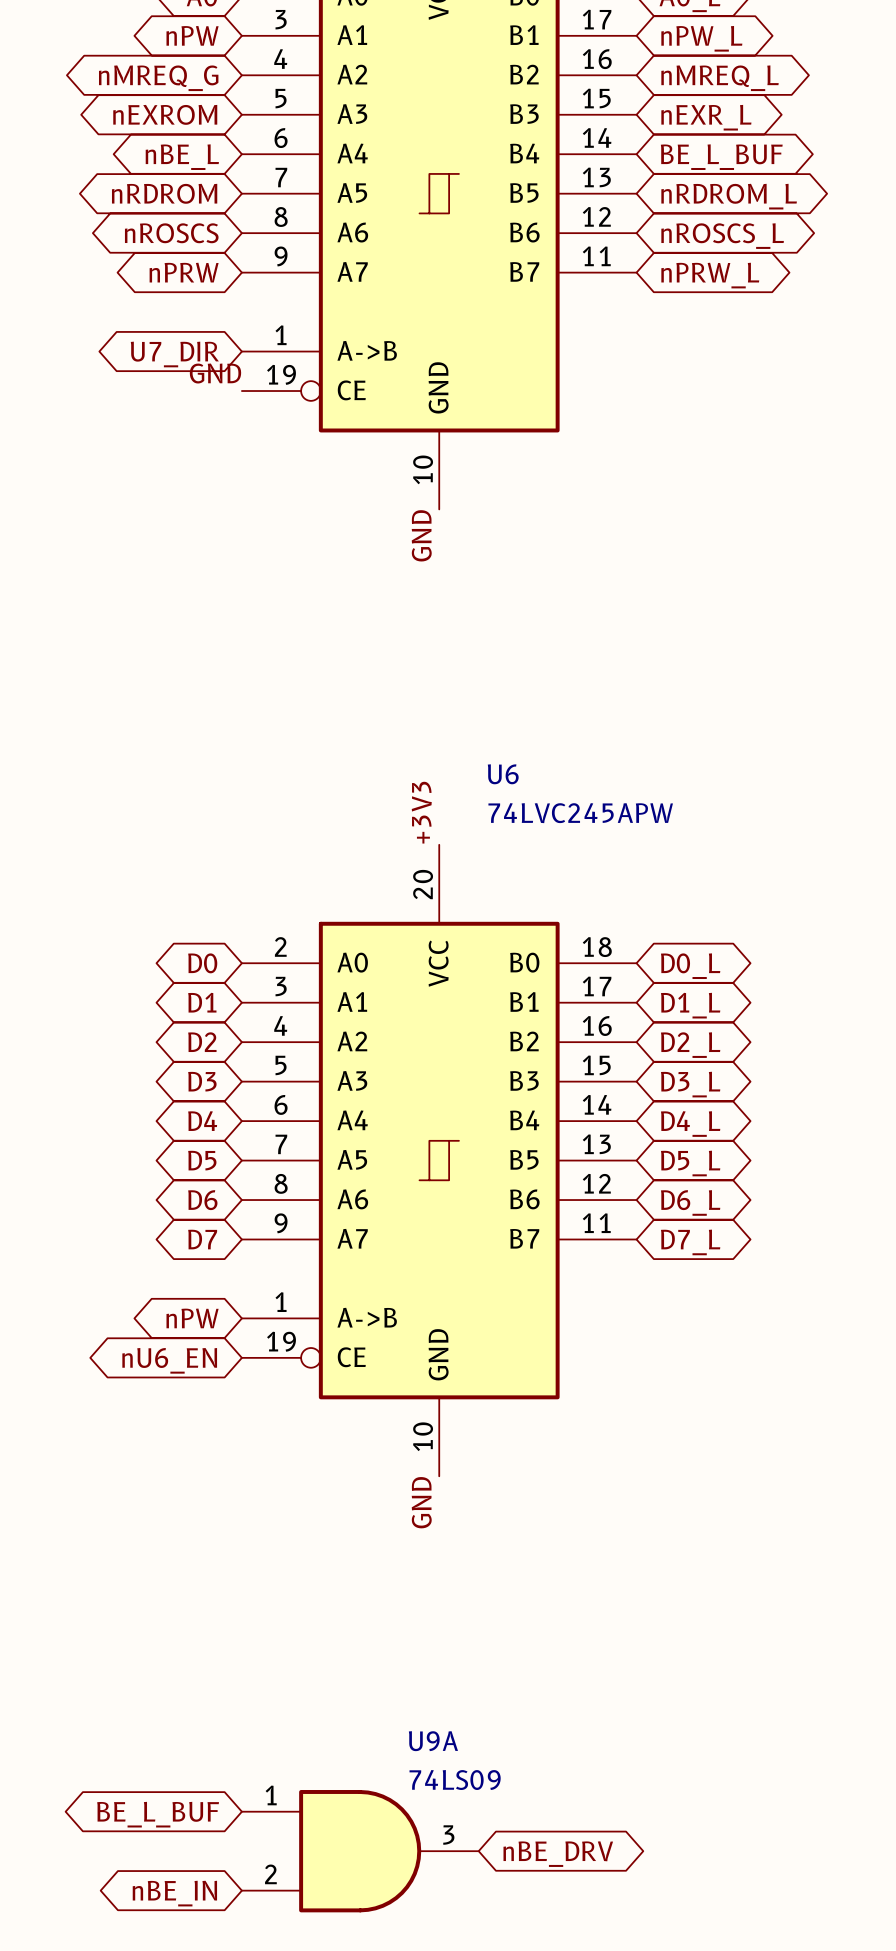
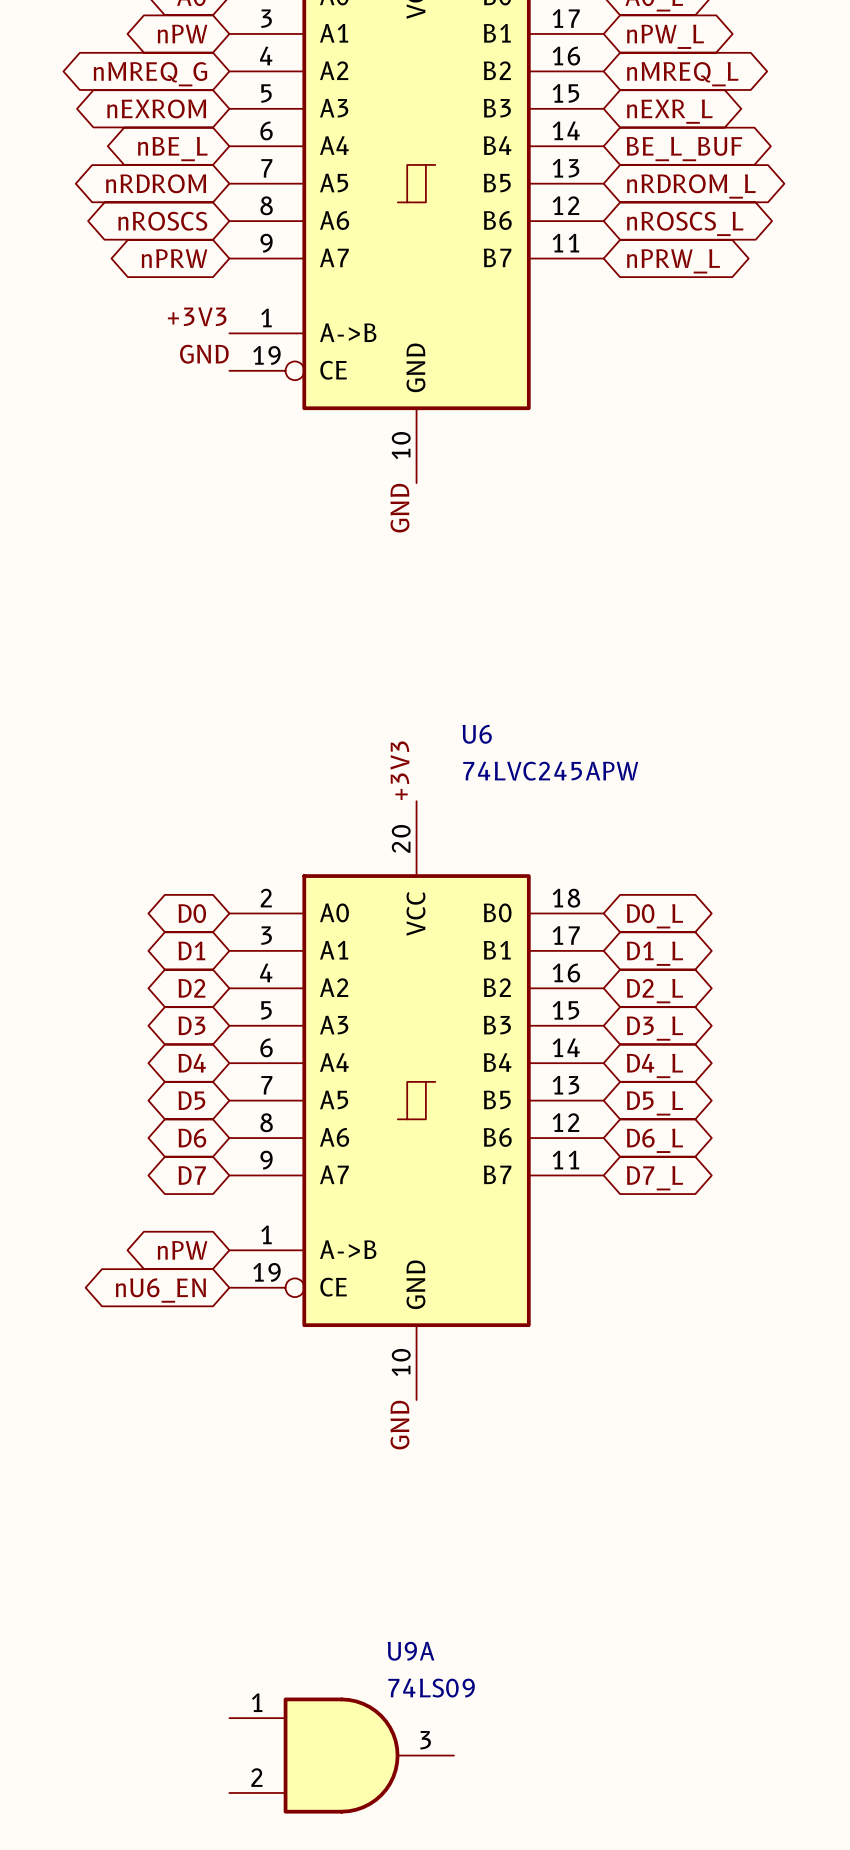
label: none -> +3V3 (197, 316)
global label: U7_DIR (174, 354) -> none
global label: BE_L_BUF (158, 1814) -> none
global label: nBE_DRV (558, 1854) -> none
global label: nBE_IN (174, 1893) -> none

